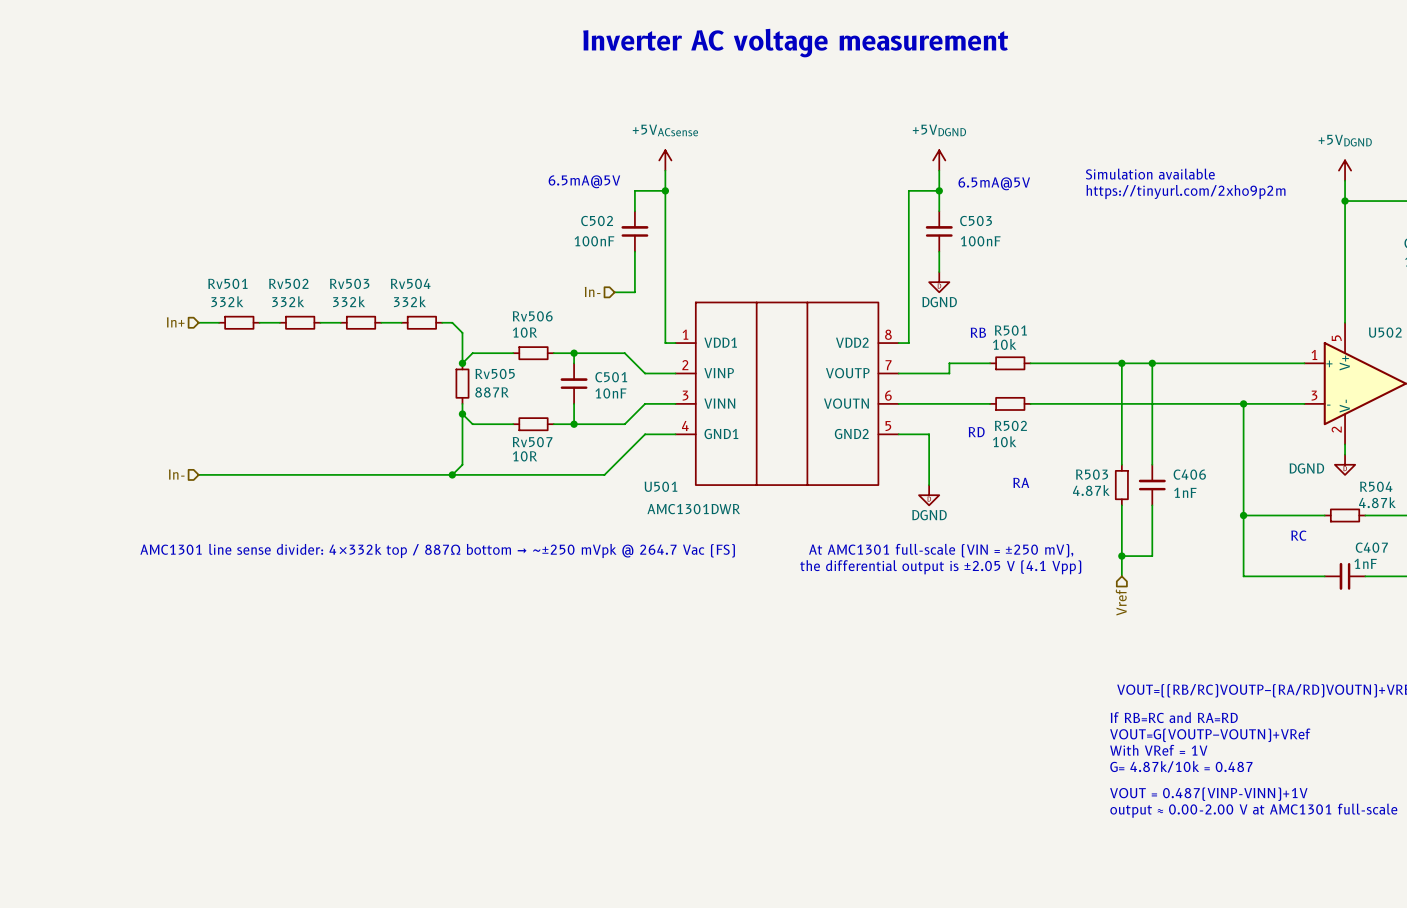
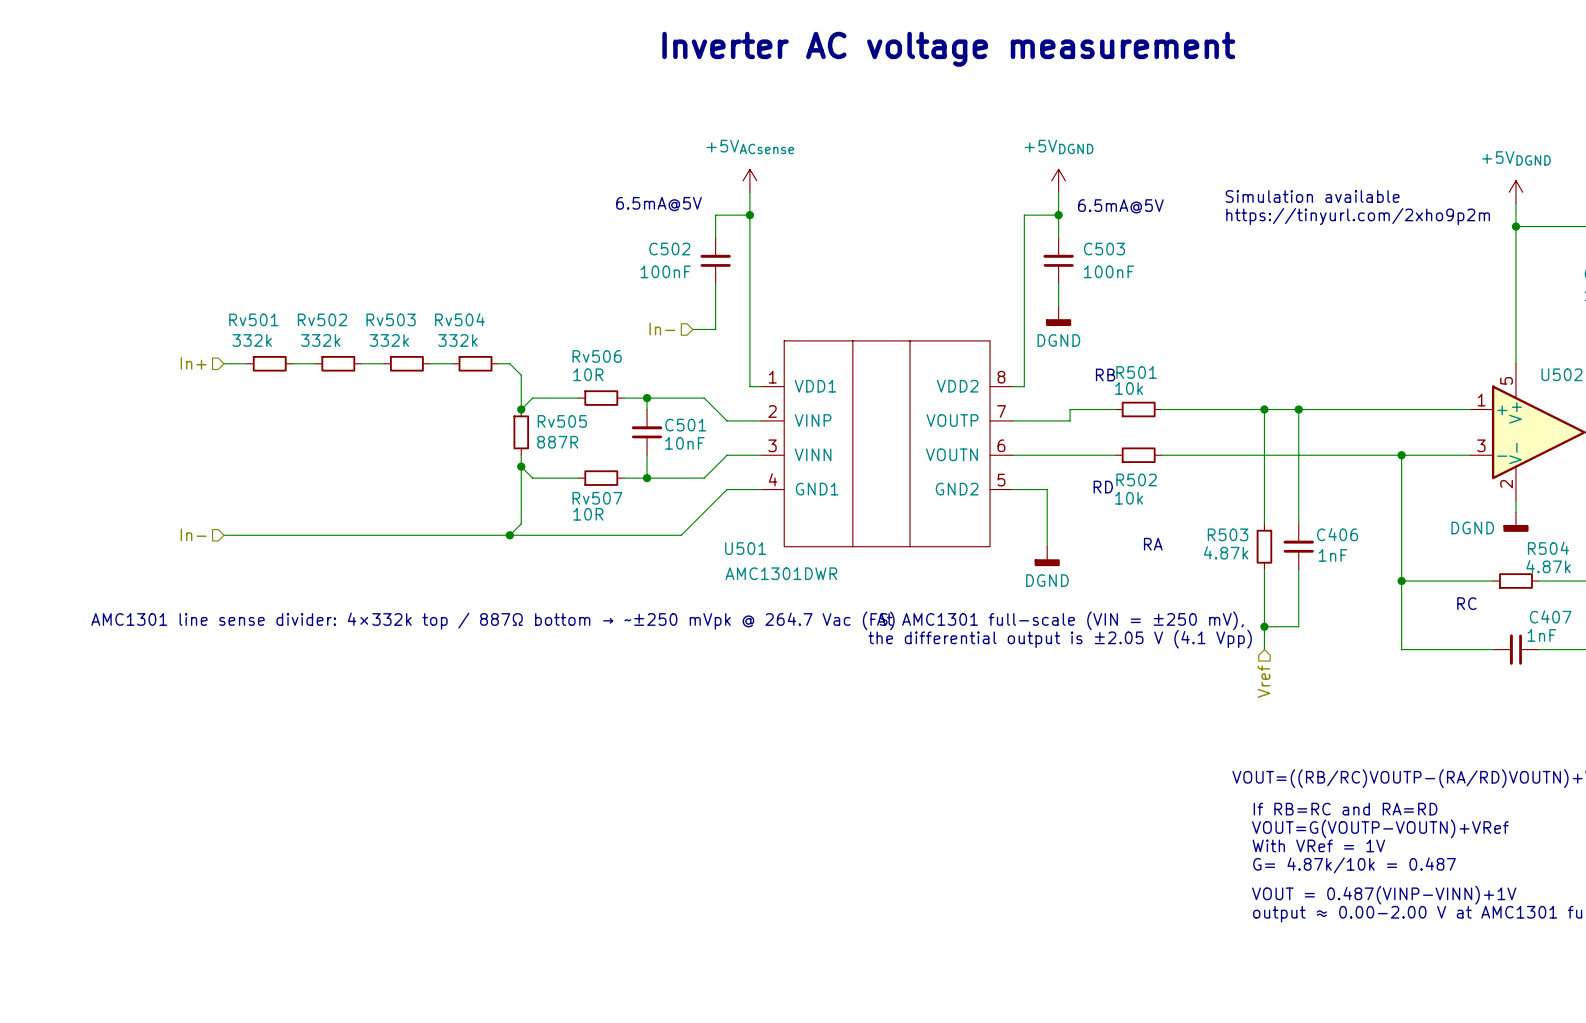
power symbol shape: [929, 272, 950, 293] -> [1046, 306, 1072, 327]
power symbol shape: [1334, 454, 1356, 475] -> [1503, 512, 1529, 532]
power symbol shape: [918, 485, 940, 506] -> [1034, 546, 1060, 567]

